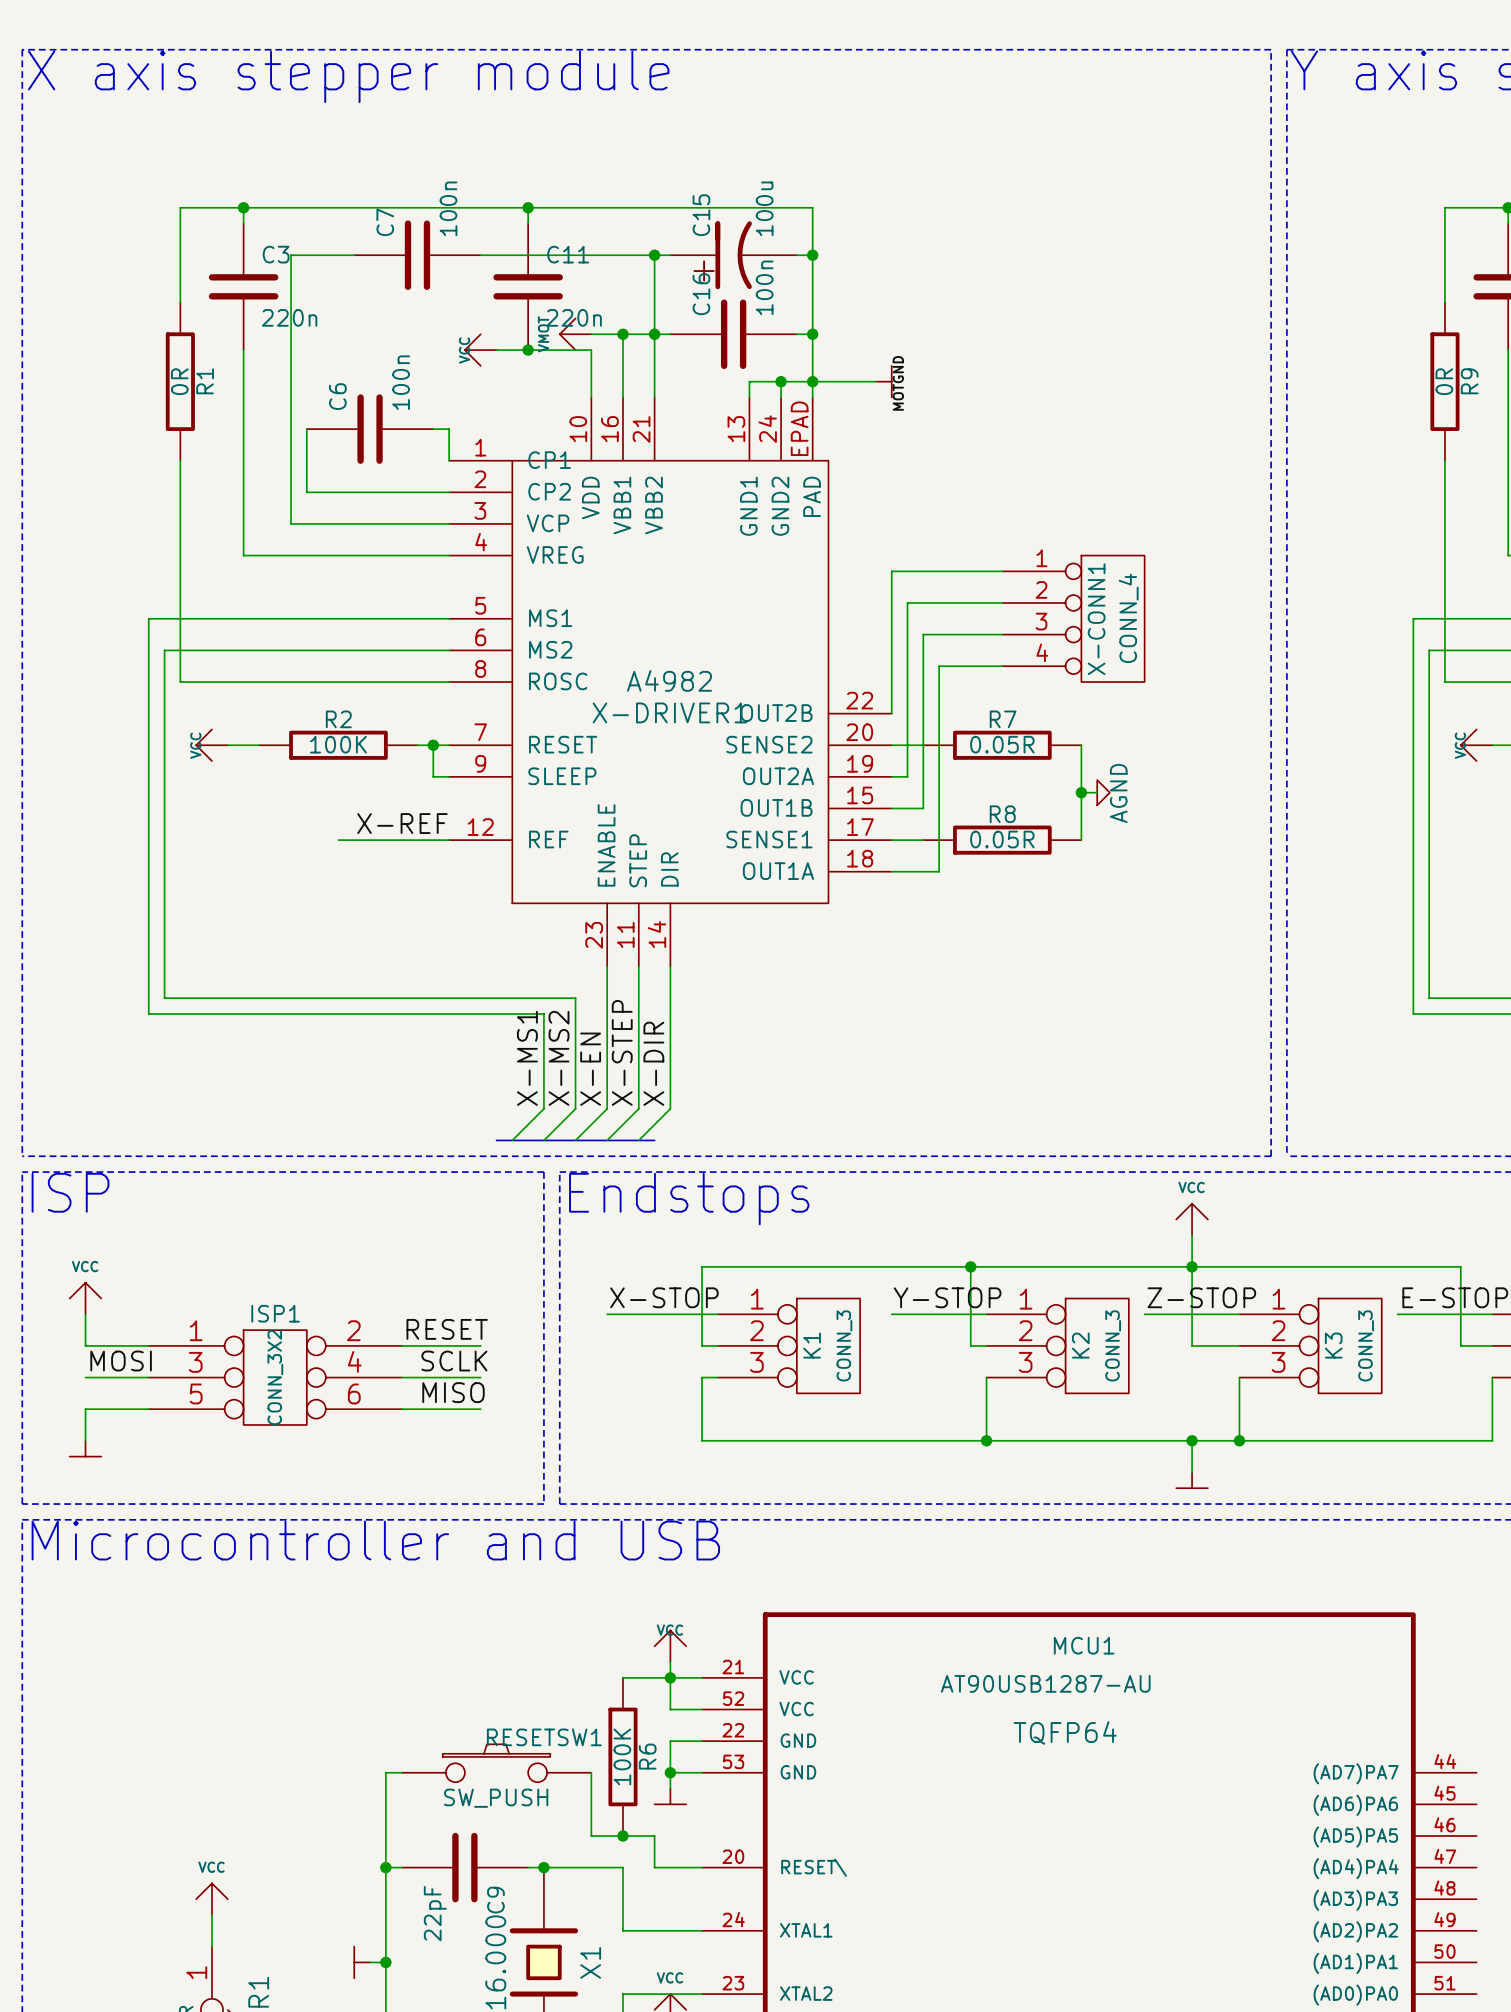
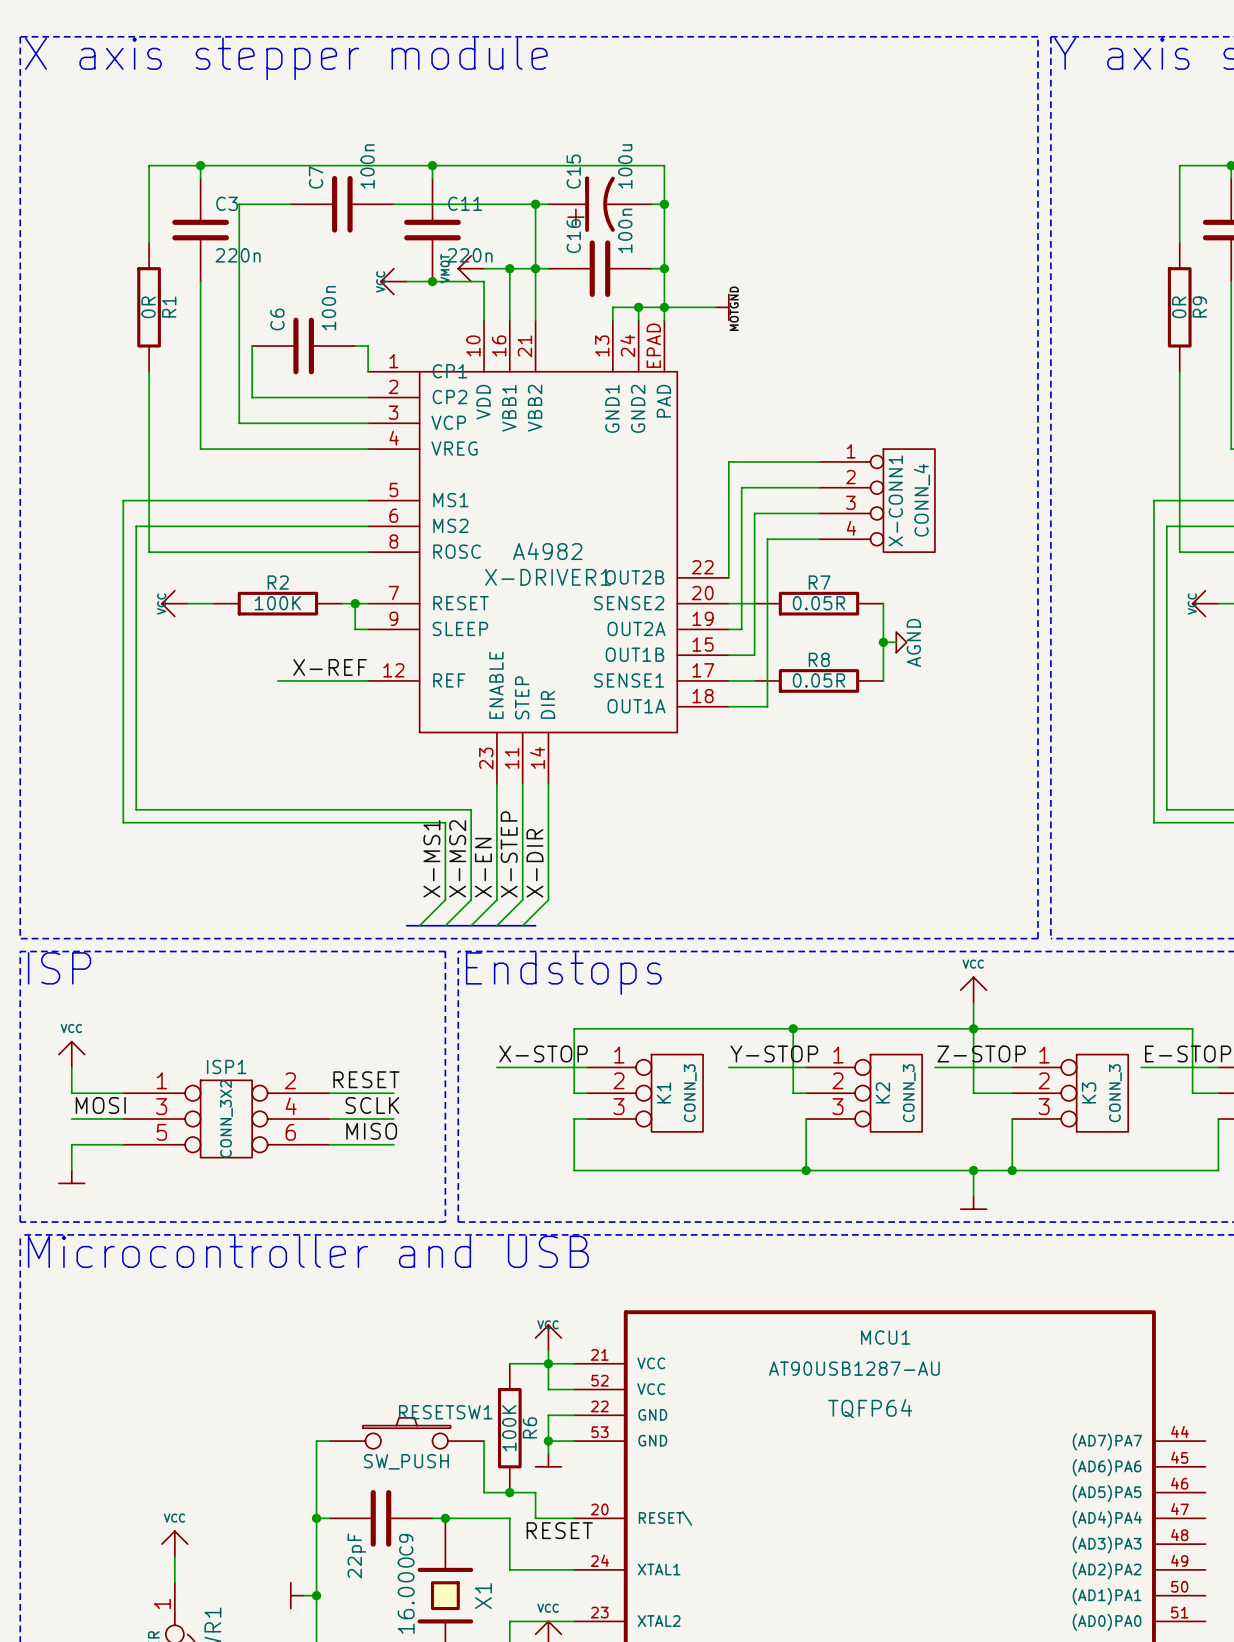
label: none -> RESET (559, 1530)

